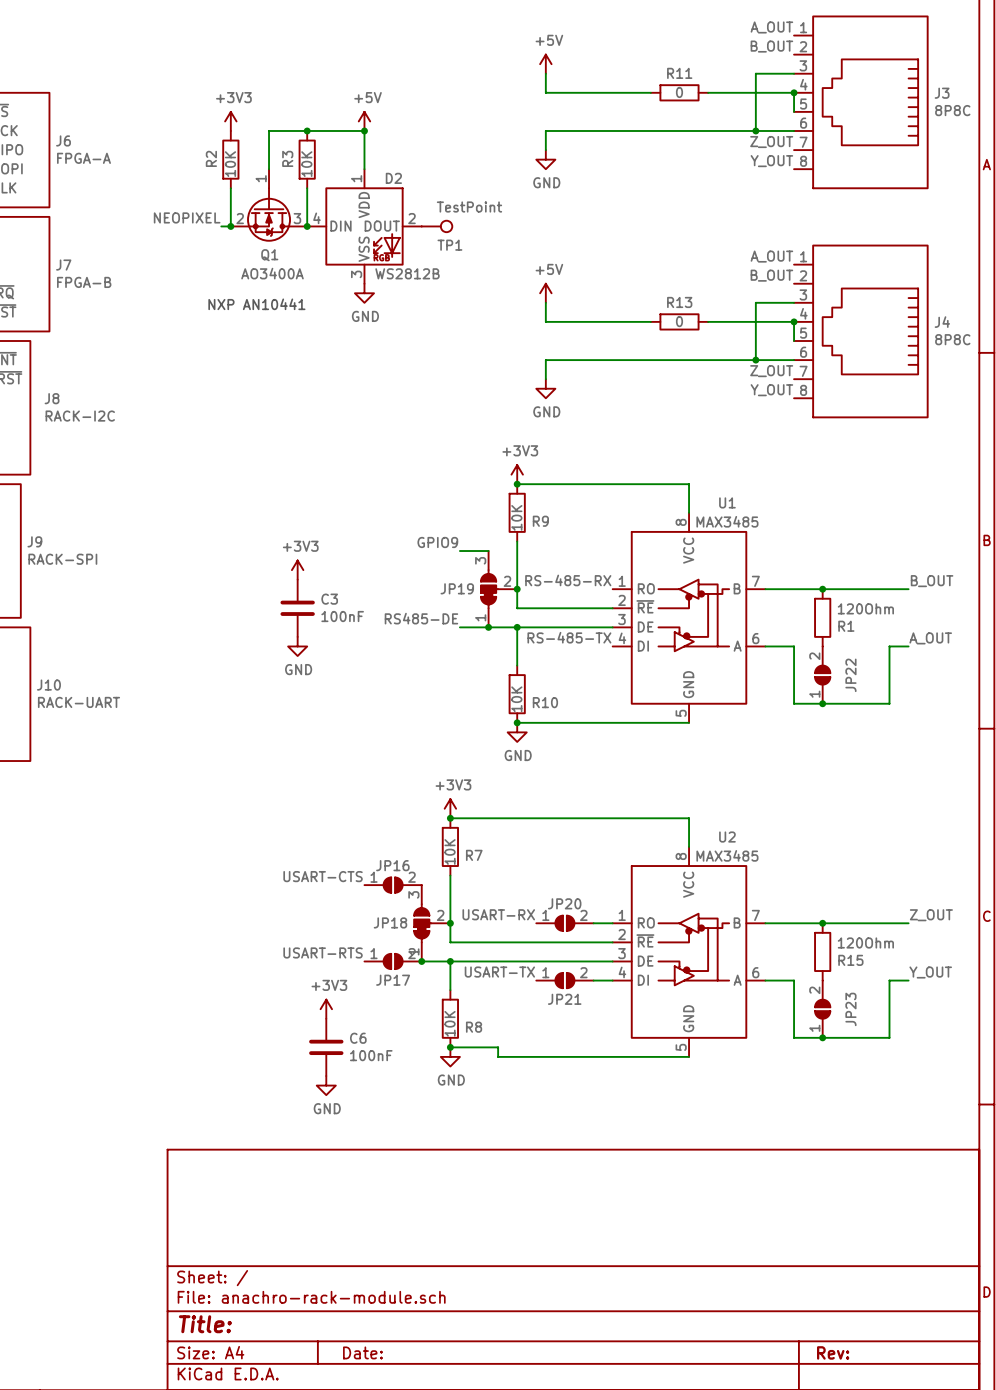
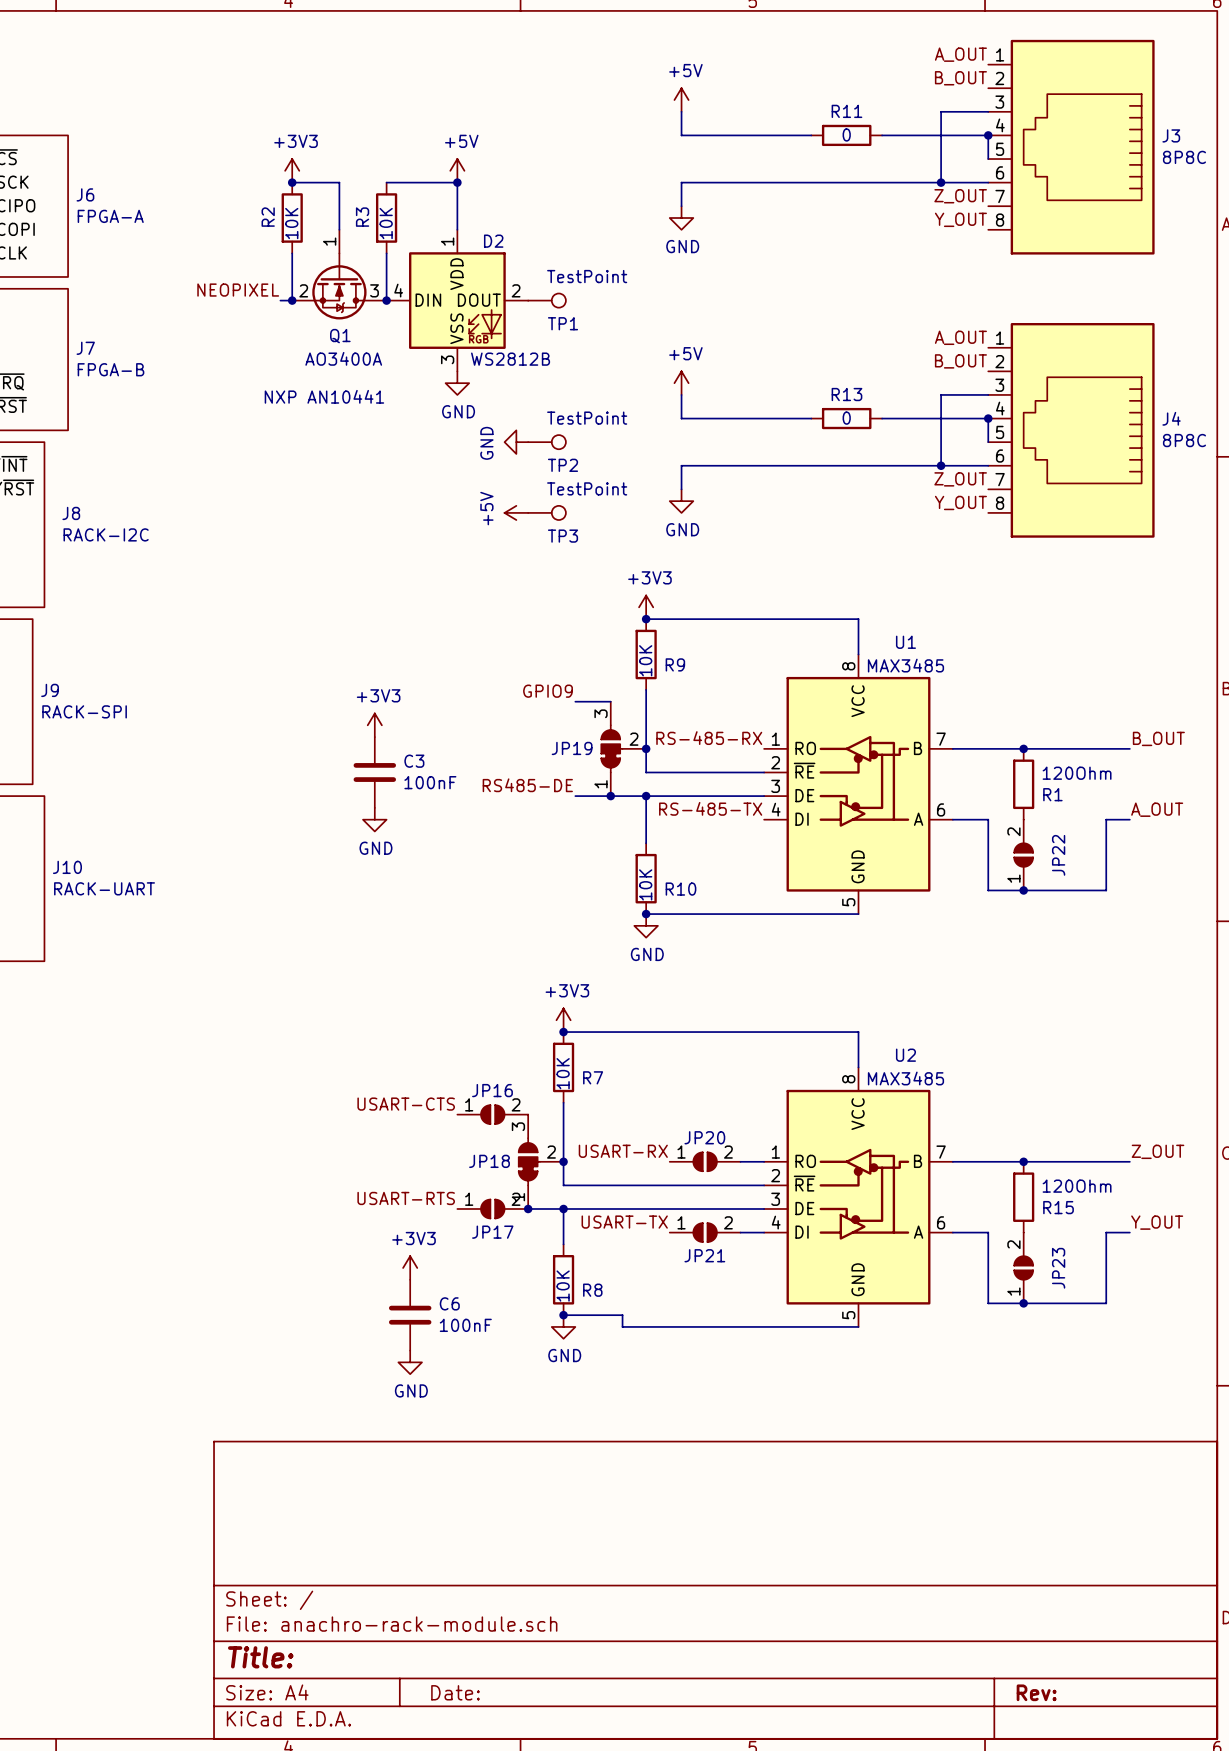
junction: none -> (292, 182)
wire: (269, 130) (307, 130) -> (339, 182) (292, 182)
junction: (307, 130) -> none
power symbol: none -> GND (516, 442)
TP2: none -> TestPoint (547, 442)
power symbol: none -> +5V (516, 512)
TP3: none -> TestPoint (547, 512)

